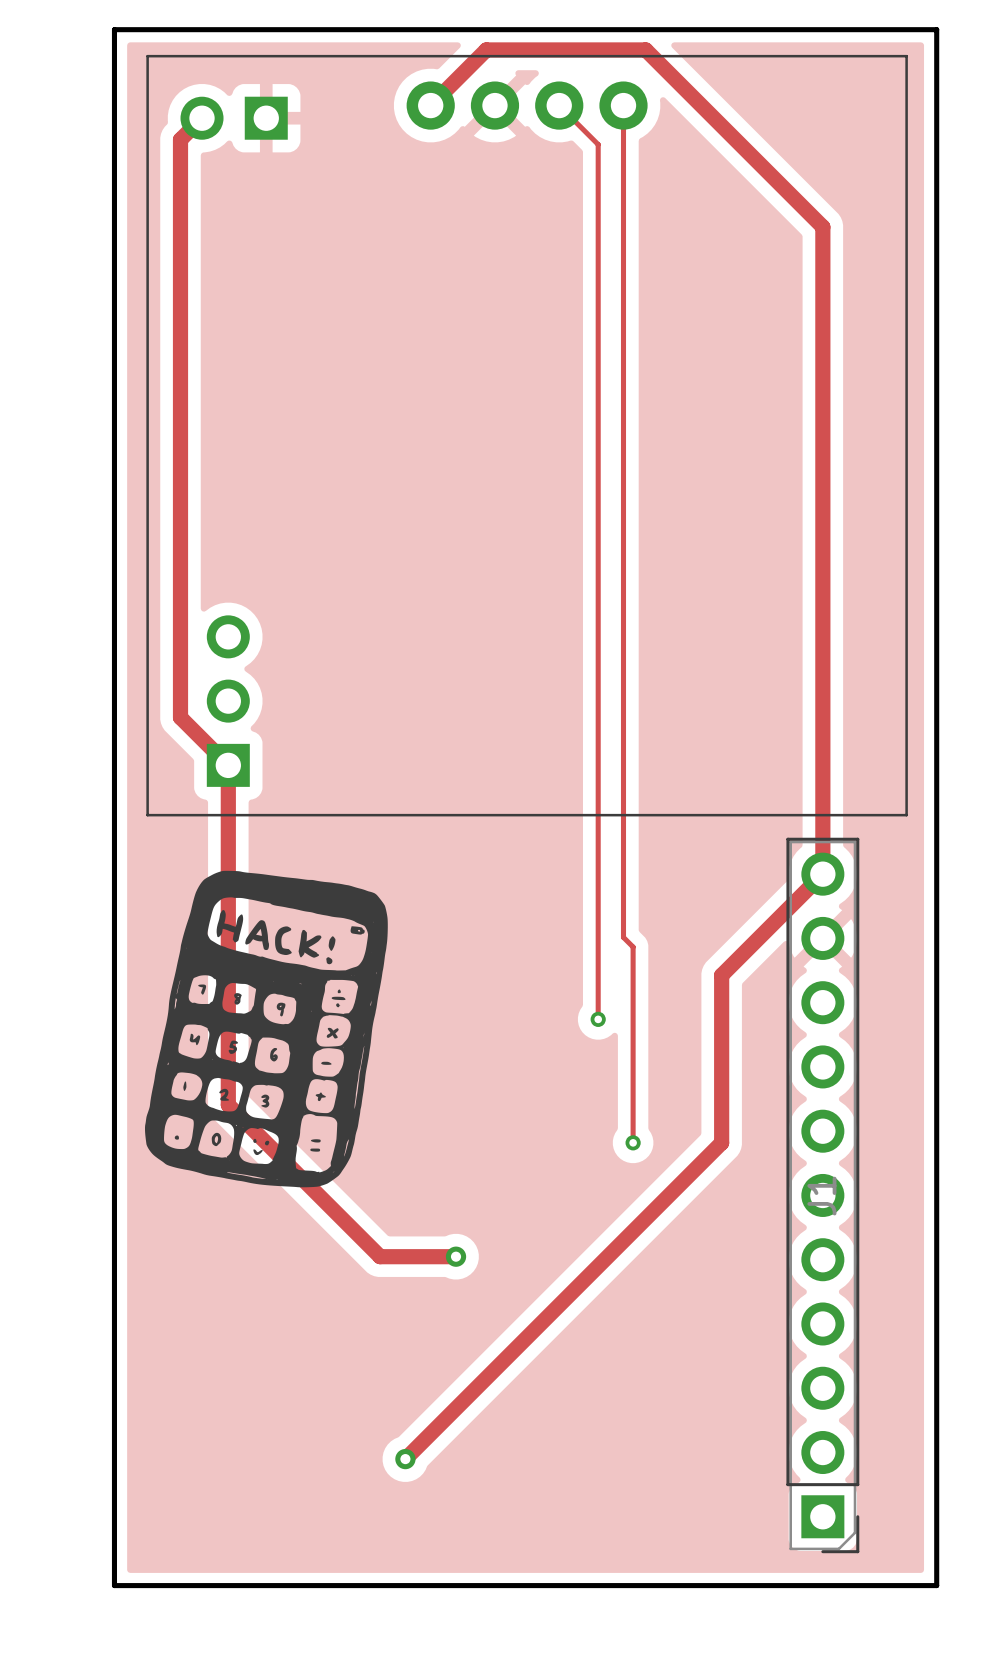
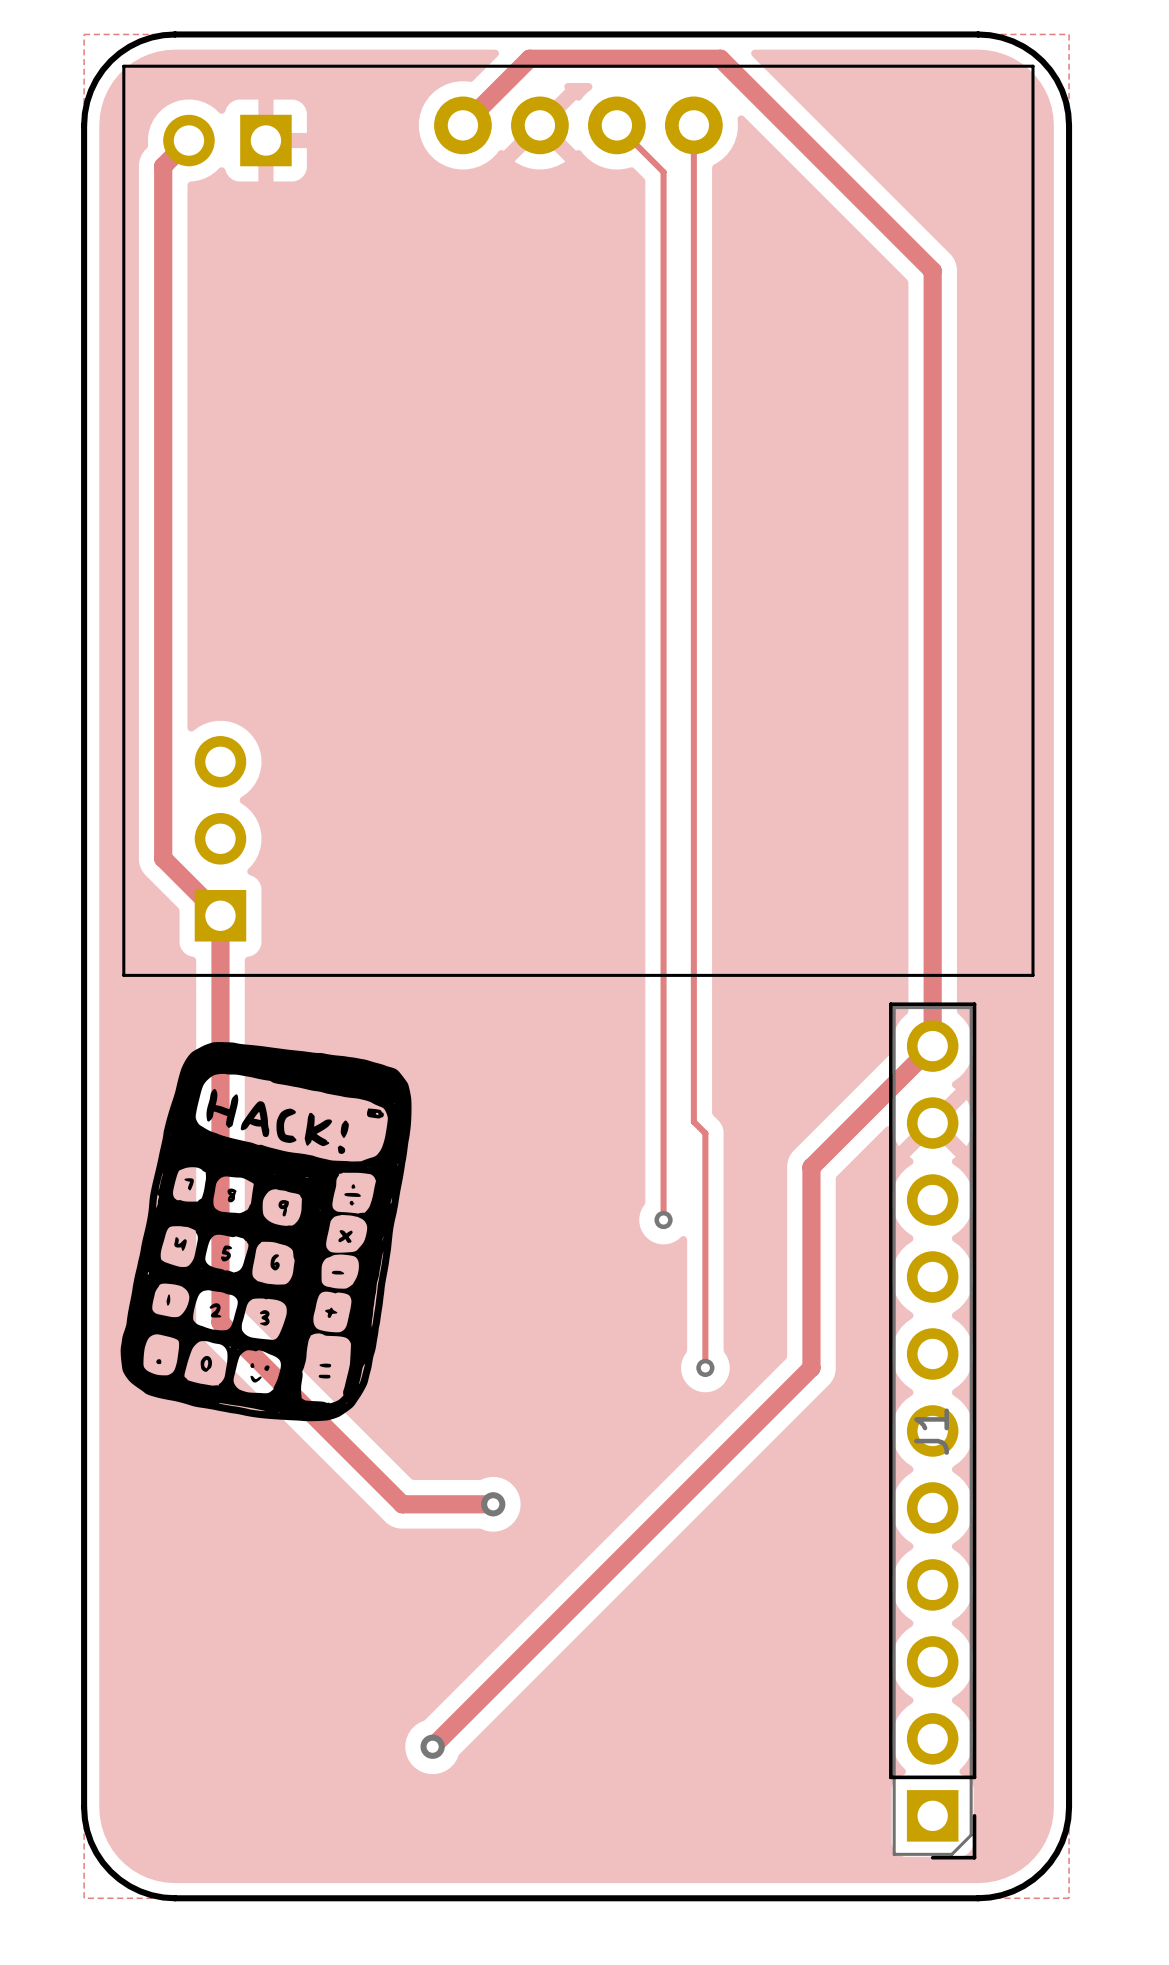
board edge: (190, 29) (114, 29) (114, 105) -> (175, 34) (151, 37) (140, 41) (119, 53) (110, 61) (96, 79) (91, 90) (87, 101) (84, 125)
board edge: (860, 29) (936, 29) (936, 105) -> (978, 34) (1001, 37) (1012, 41) (1033, 53) (1042, 61) (1050, 70) (1062, 90) (1065, 101) (1069, 125)
board edge: (114, 1509) (114, 1585) (190, 1585) -> (84, 1807) (84, 1819) (91, 1842) (96, 1852) (110, 1871) (119, 1879) (140, 1891) (163, 1897) (175, 1898)
board edge: (936, 1509) (936, 1585) (860, 1585) -> (1069, 1807) (1065, 1830) (1062, 1842) (1056, 1852) (1042, 1871) (1023, 1886) (1012, 1891) (990, 1897) (978, 1898)

